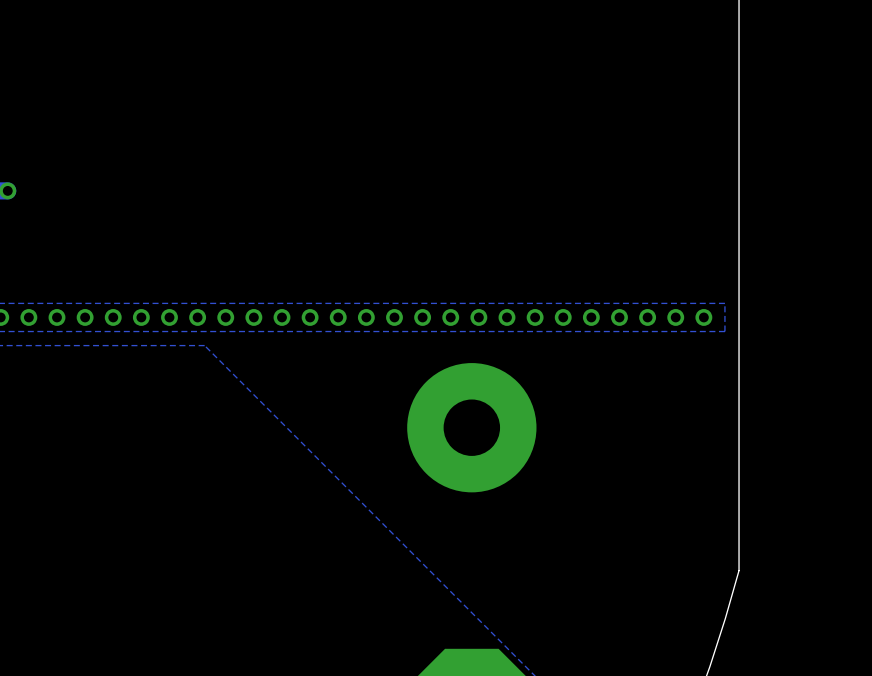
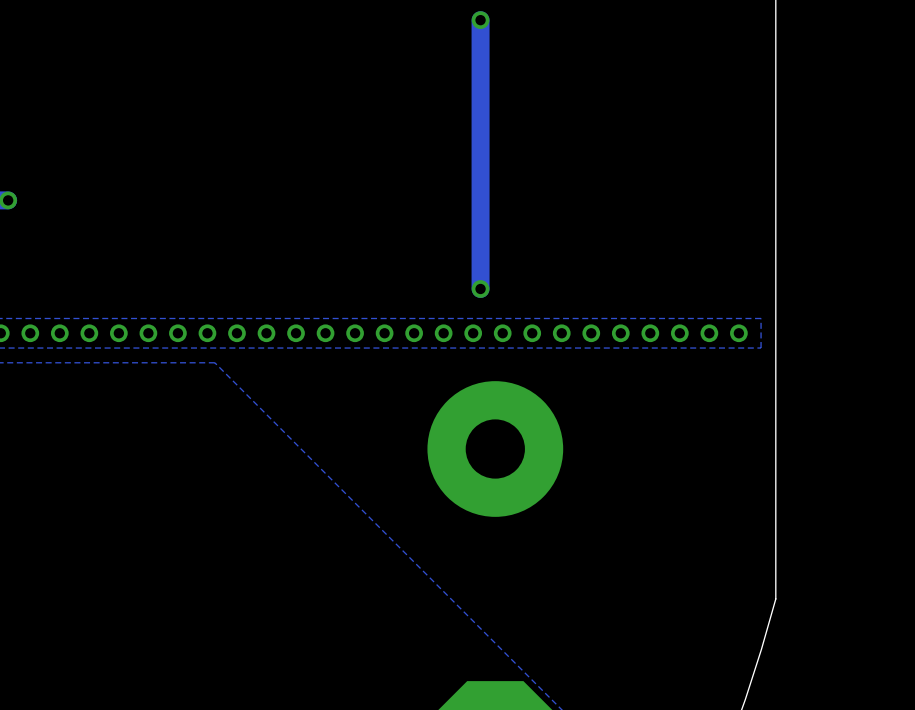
track: none -> (480, 20) (480, 288)
via: none -> (480, 20)
via: none -> (480, 288)

